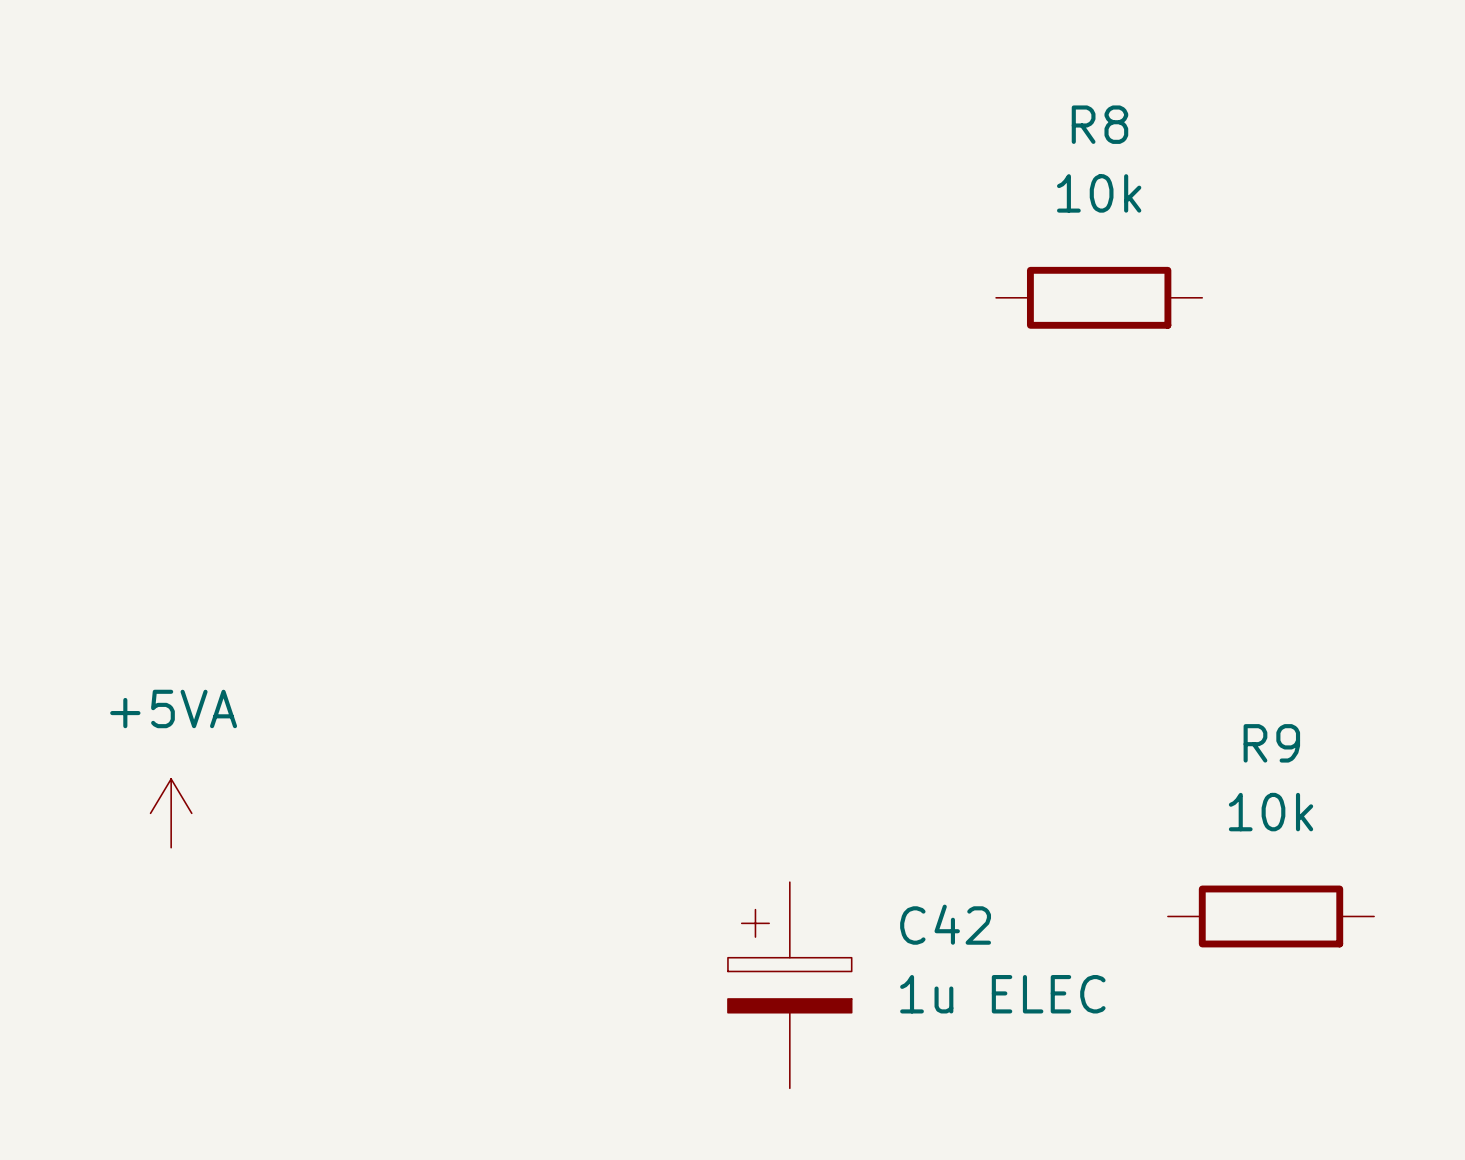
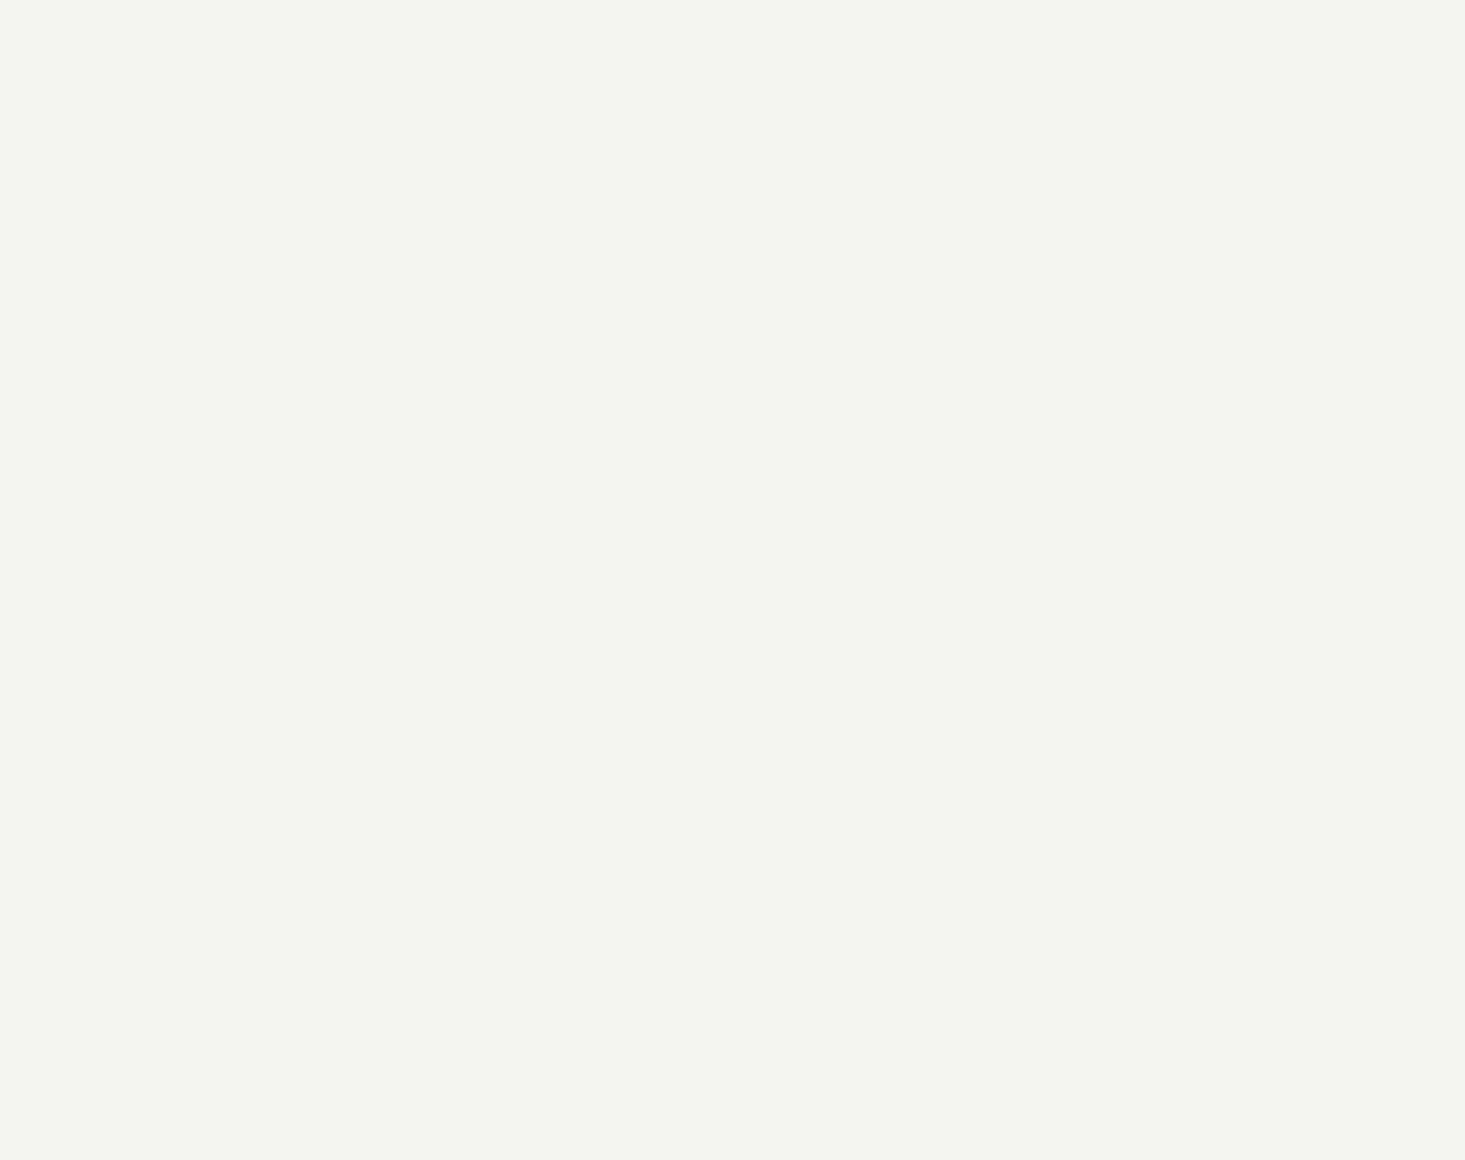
R8: 10k (1099, 297) -> none
power symbol: +5VA (171, 813) -> none
R9: 10k (1271, 916) -> none
C42: 1u ELEC (789, 985) -> none

